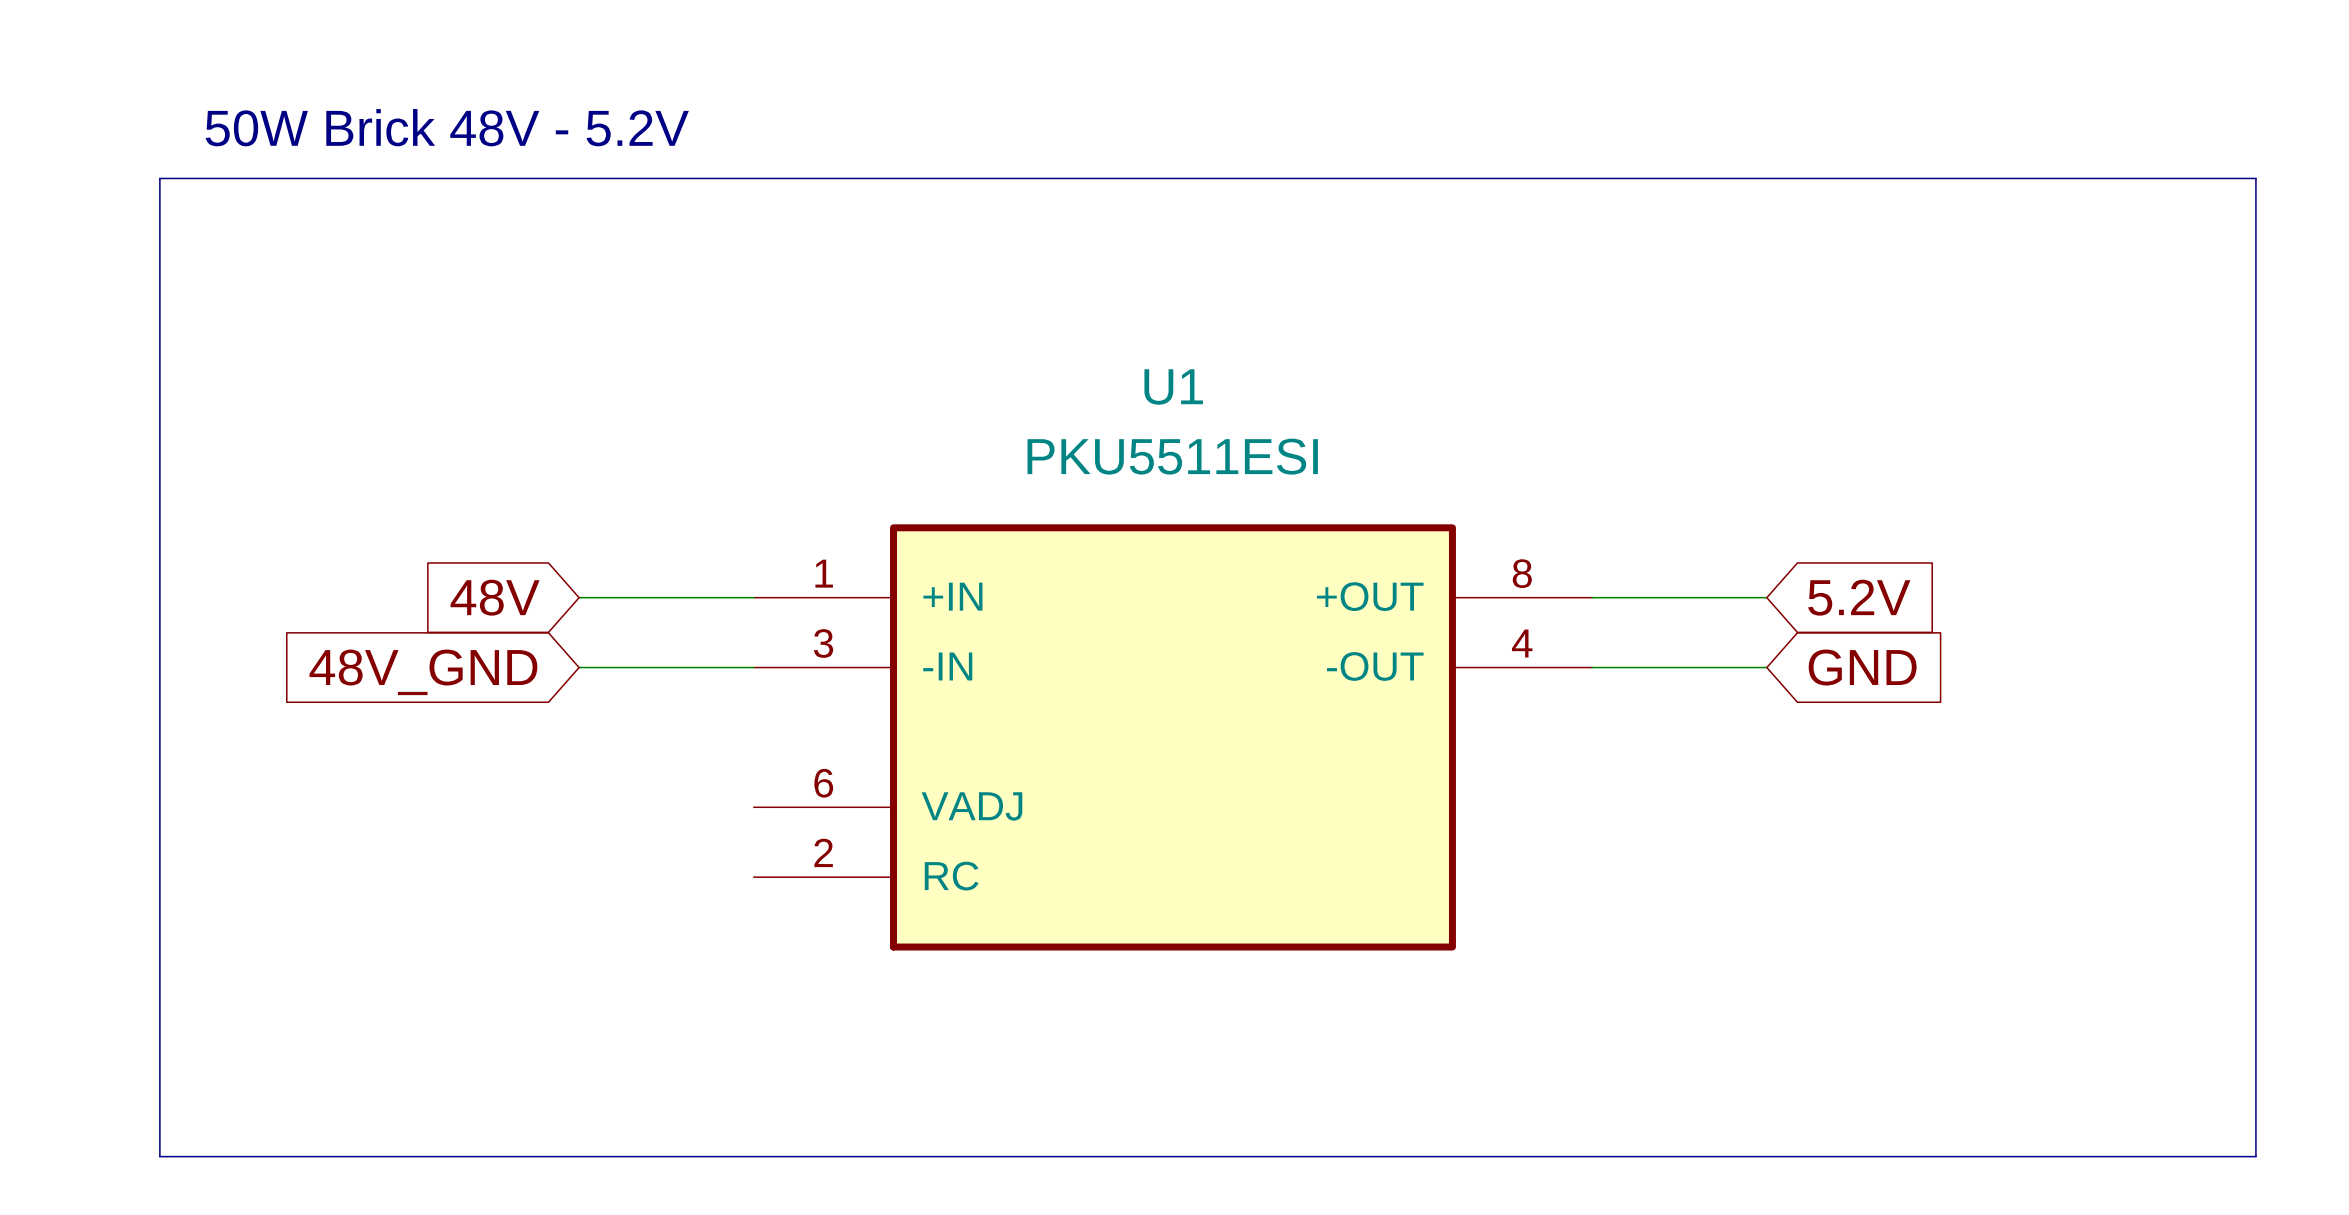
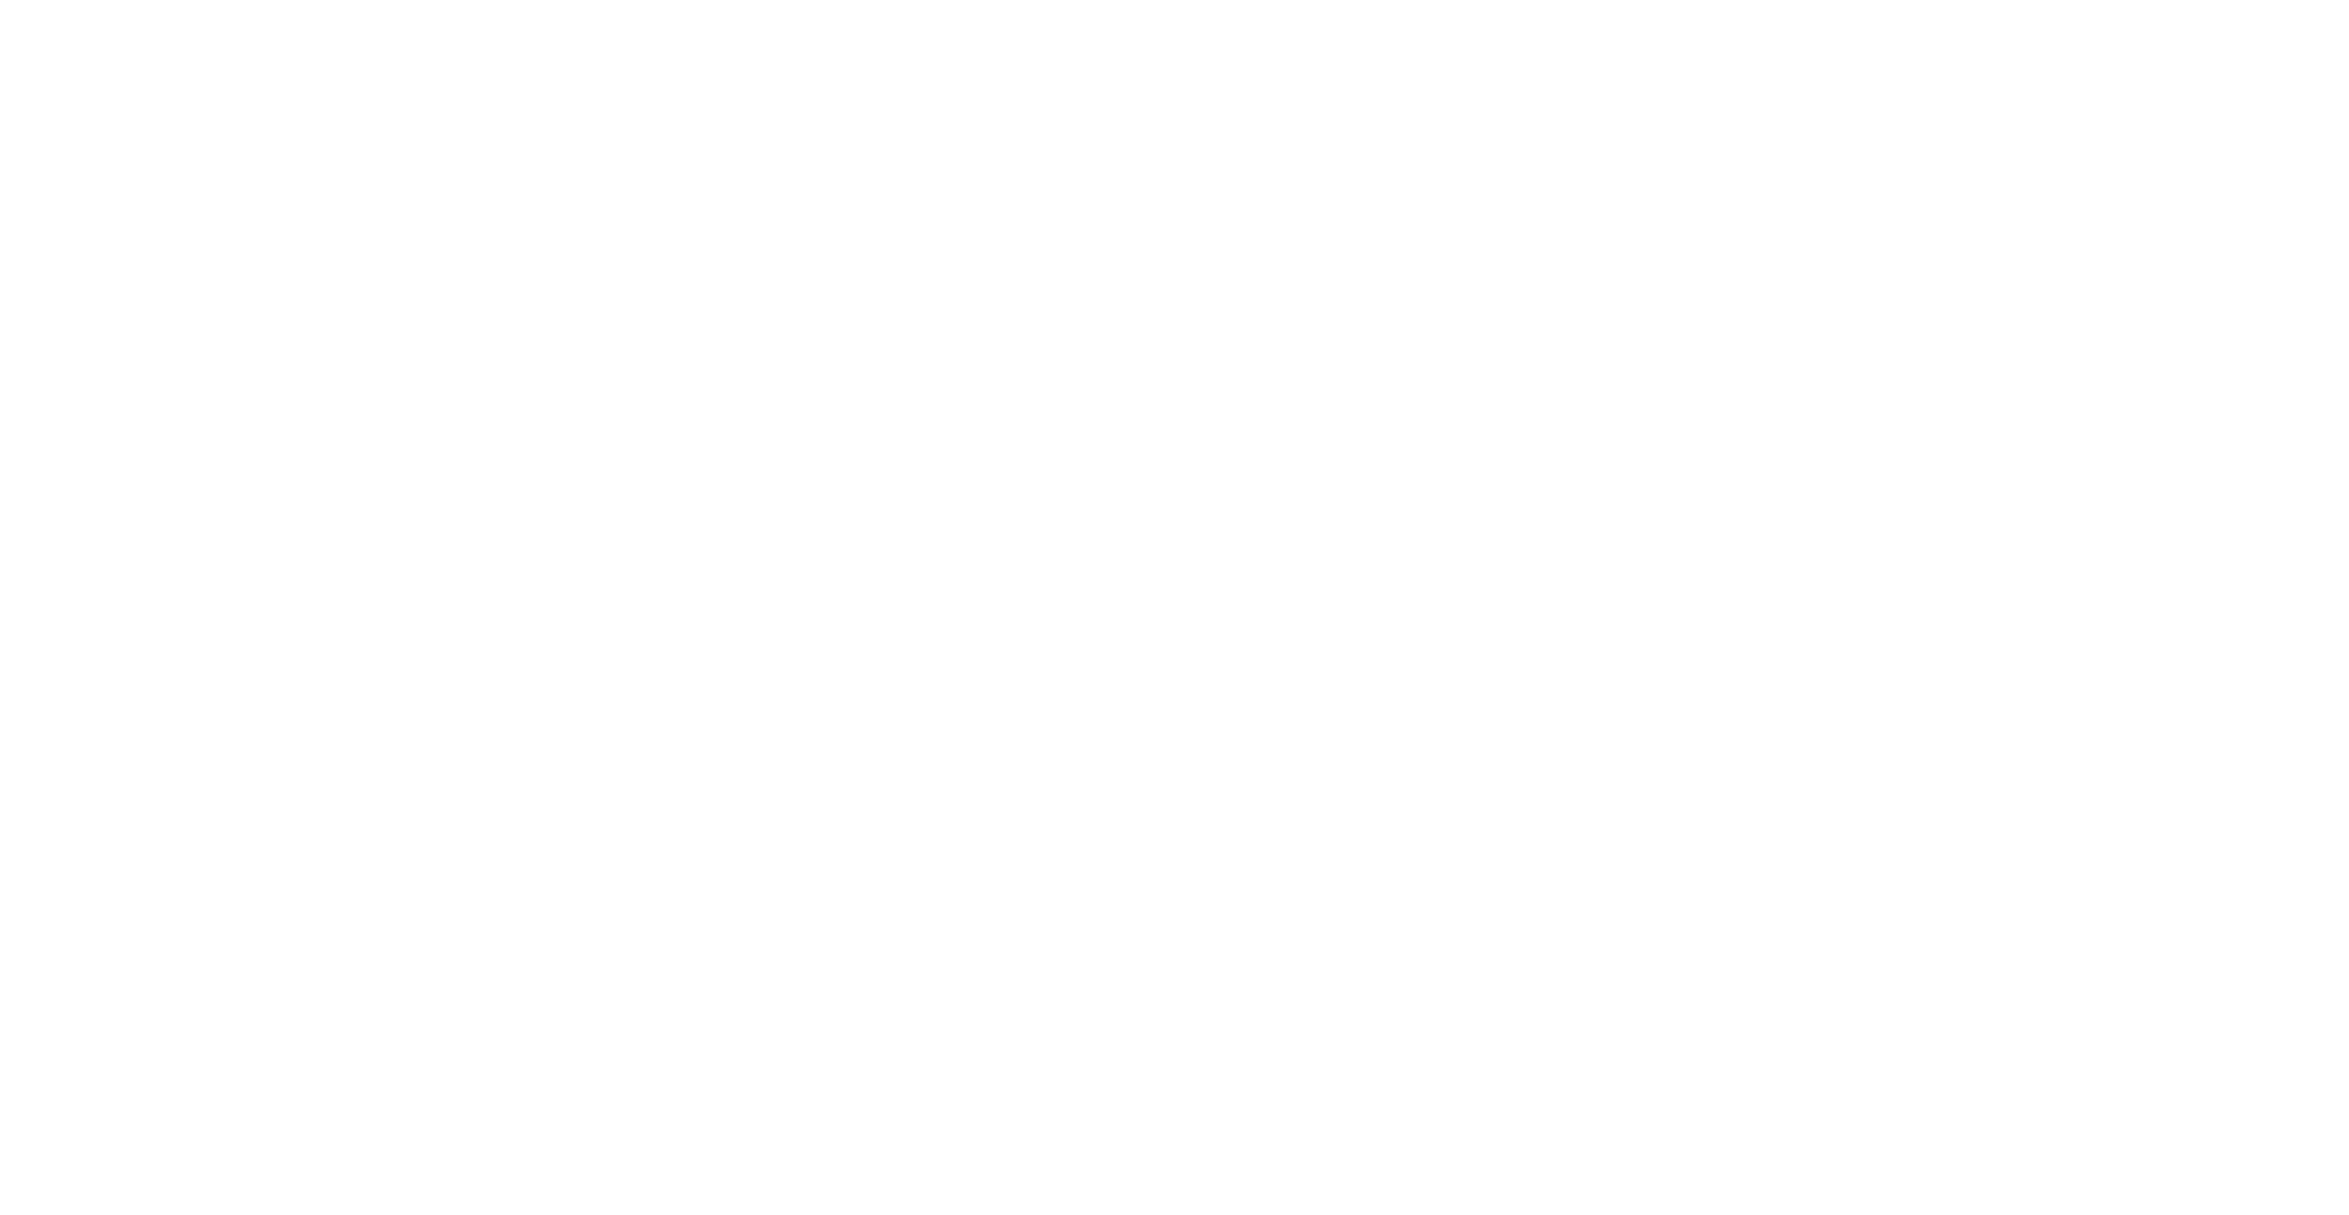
text: 50W Brick 48V - 5.2V (447, 127) -> none
line: (159, 178) (2255, 178) (2255, 1156) (159, 1156) (159, 178) -> none
global label: 48V (495, 597) -> none
wire: (579, 597) (753, 597) -> none
wire: (1592, 597) (1766, 597) -> none
global label: 5.2V (1859, 597) -> none
wire: (579, 667) (753, 667) -> none
wire: (1592, 667) (1766, 667) -> none
global label: GND (1862, 667) -> none
global label: 48V_GND (423, 672) -> none
U1: PKU5511ESI (1172, 737) -> none

